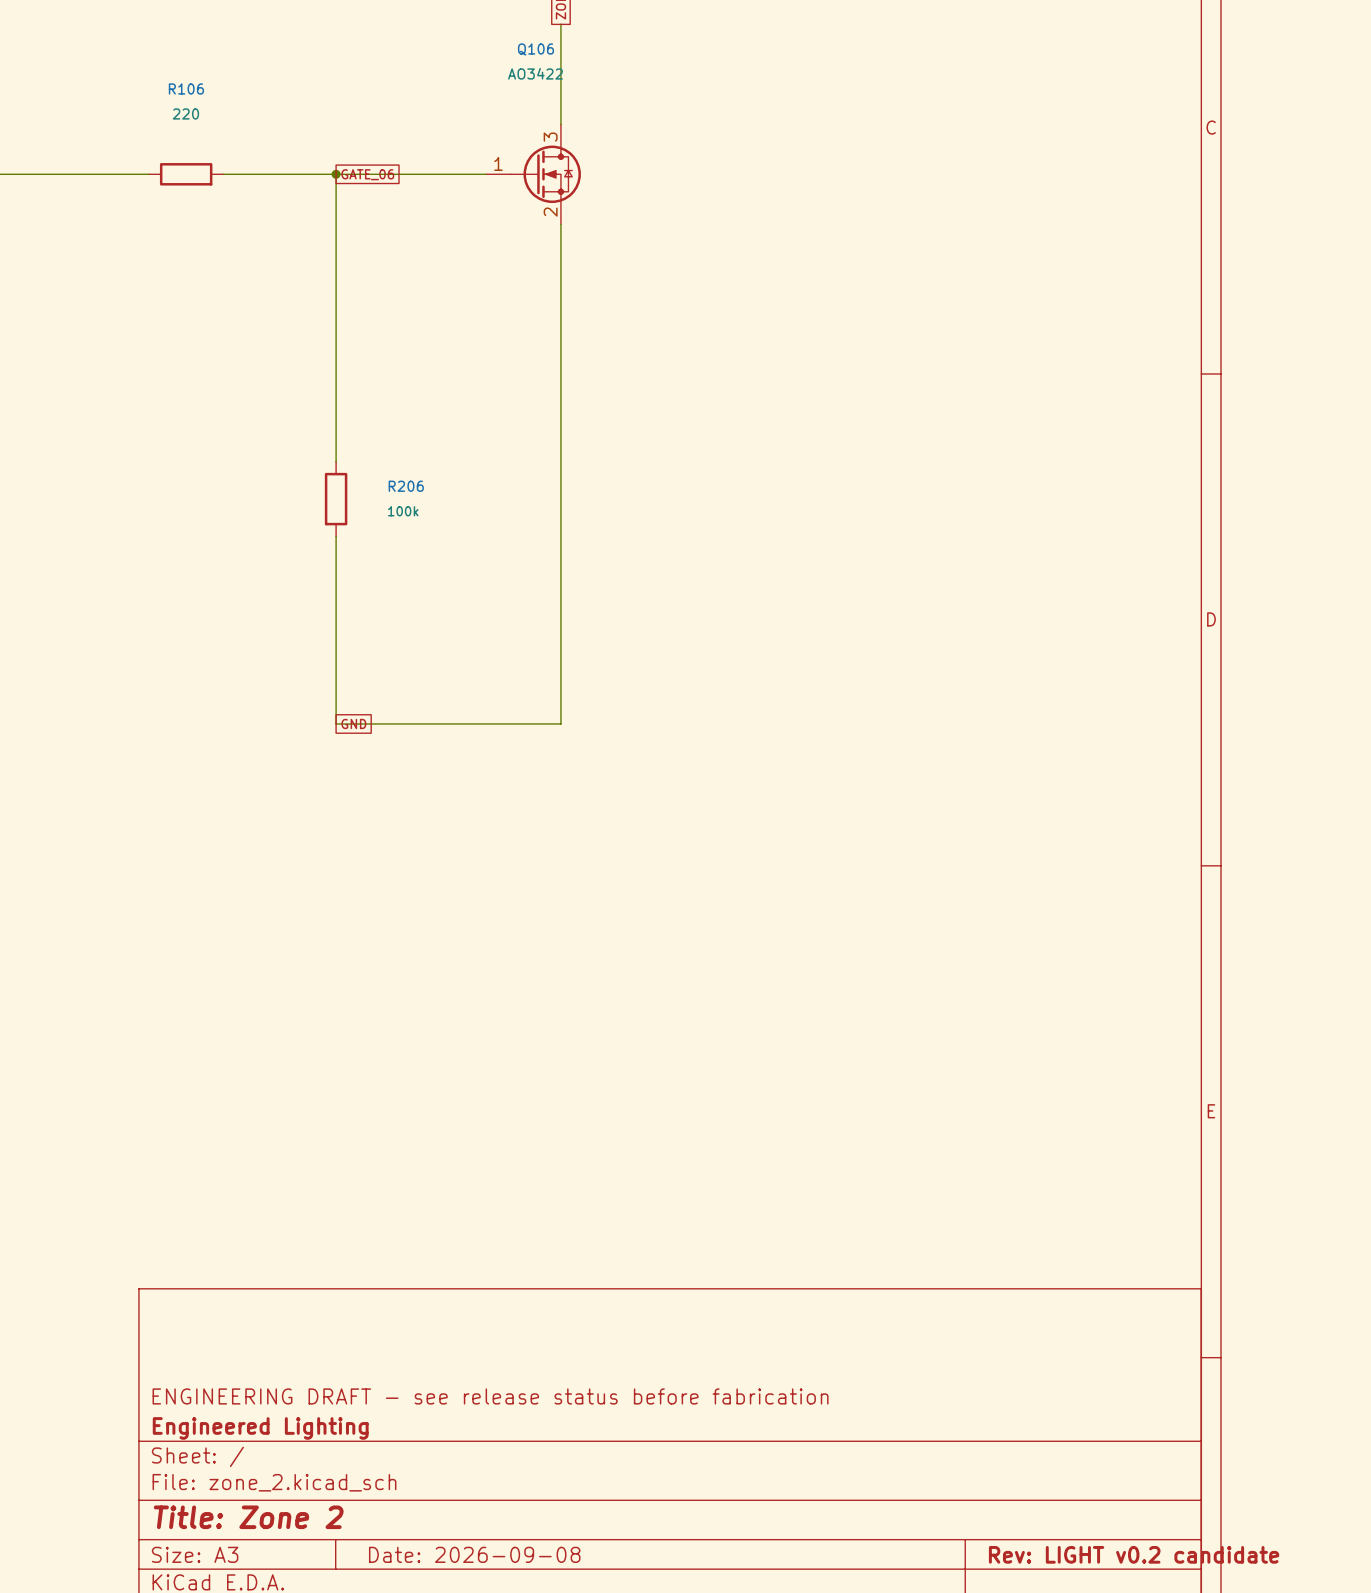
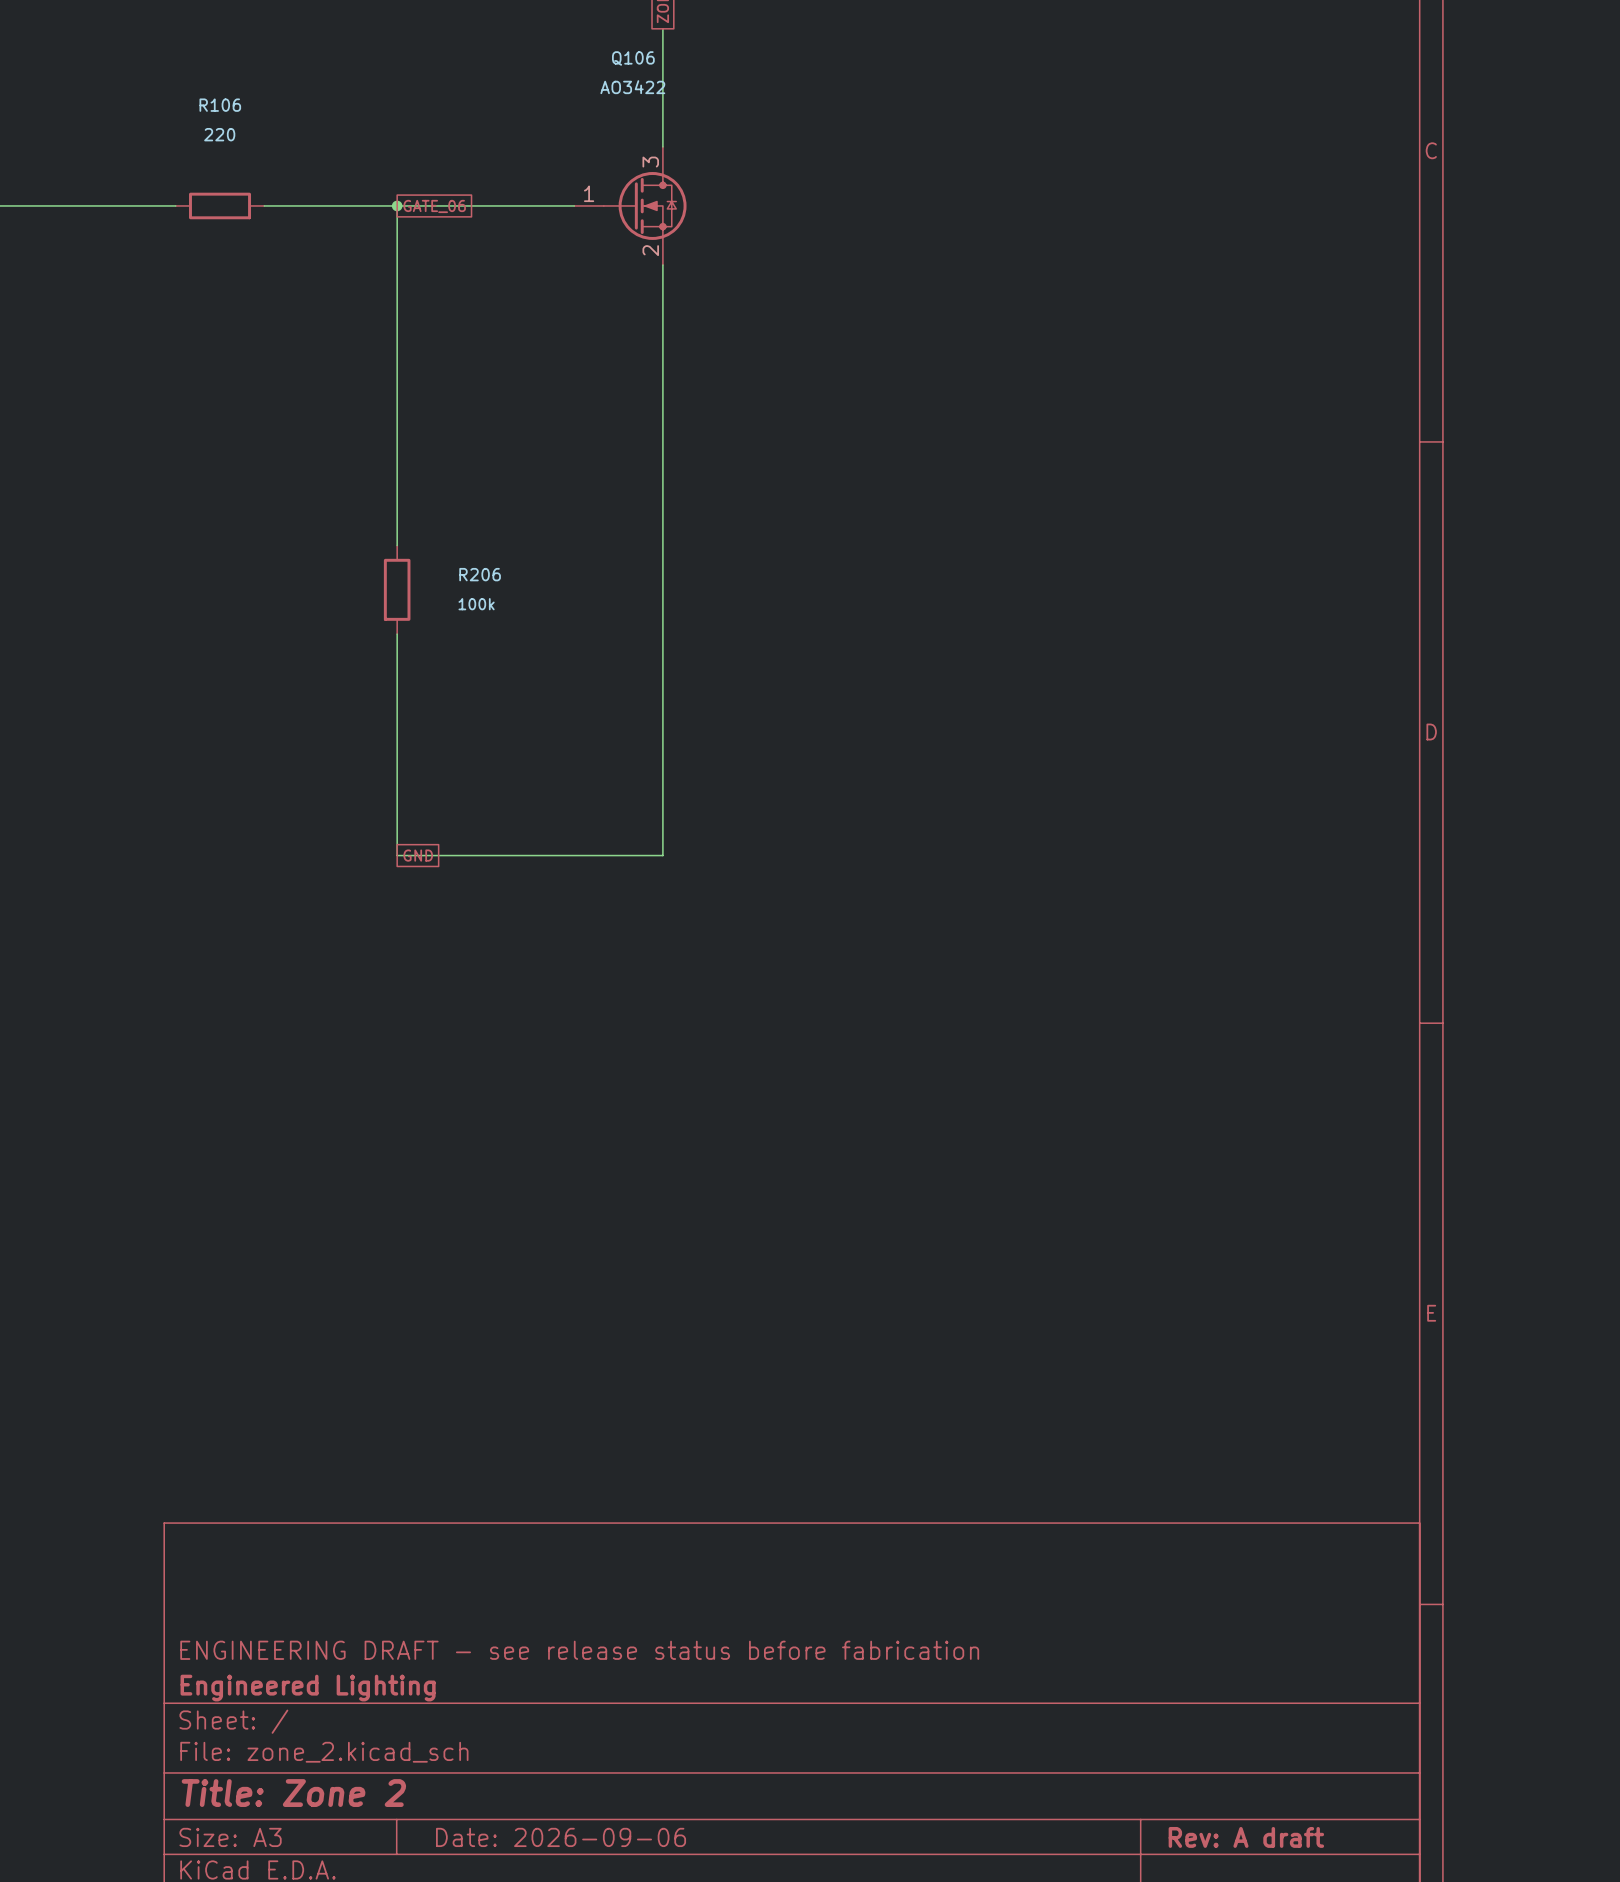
title block: Date: 2026-09-08 (474, 1554) -> Date: 2026-09-06 (561, 1837)
title block: Rev: LIGHT v0.2 candidate (1134, 1554) -> Rev: A draft (1246, 1837)

